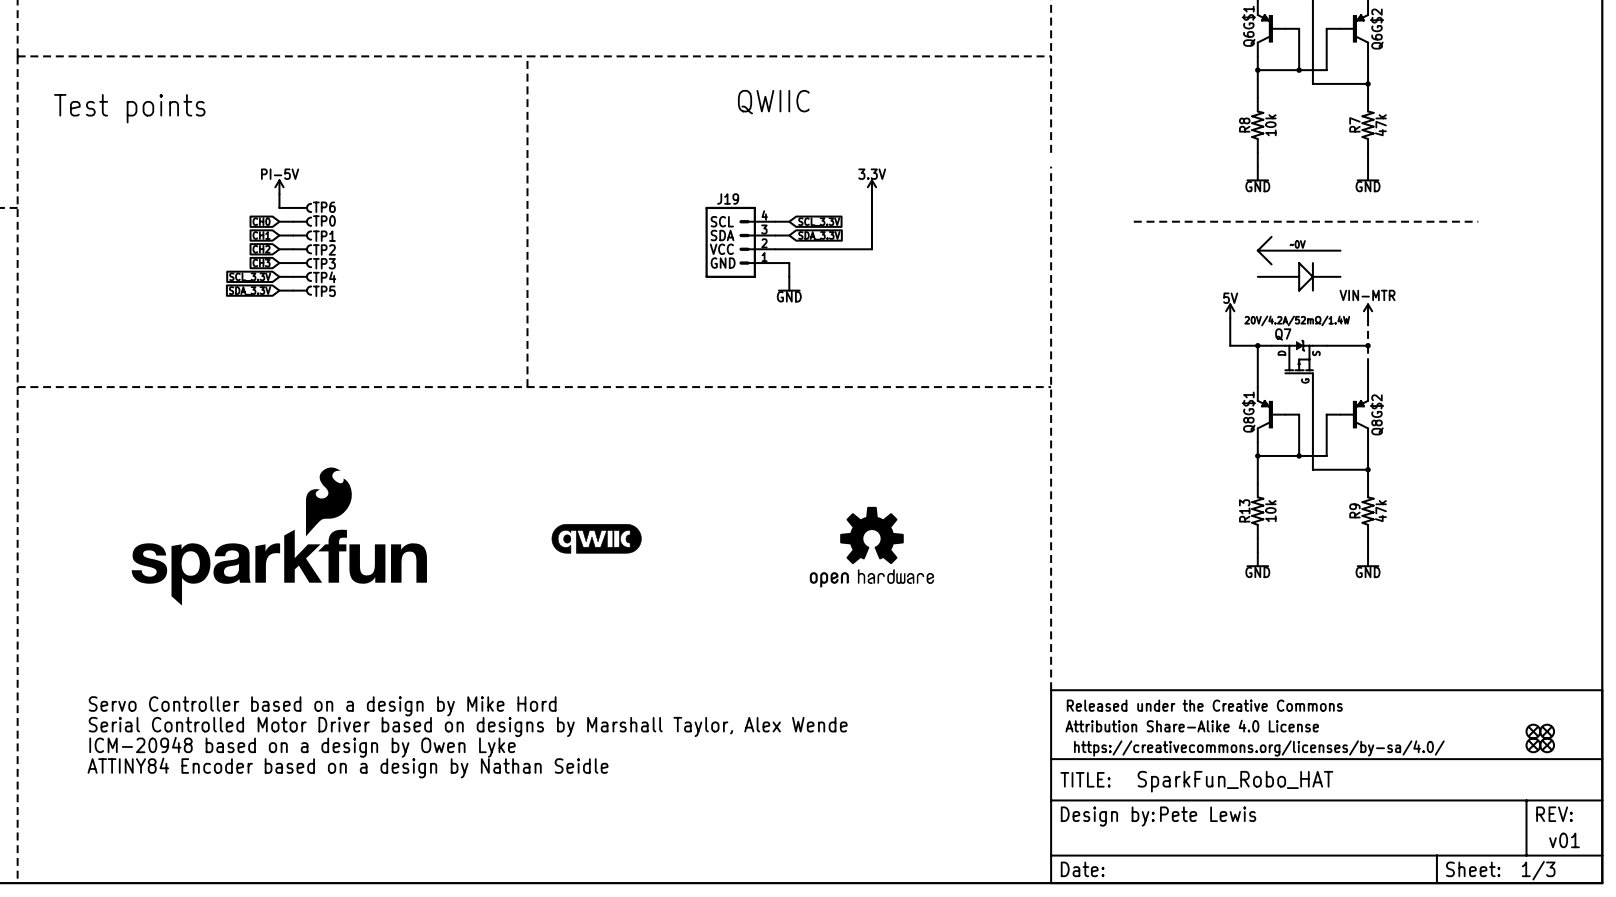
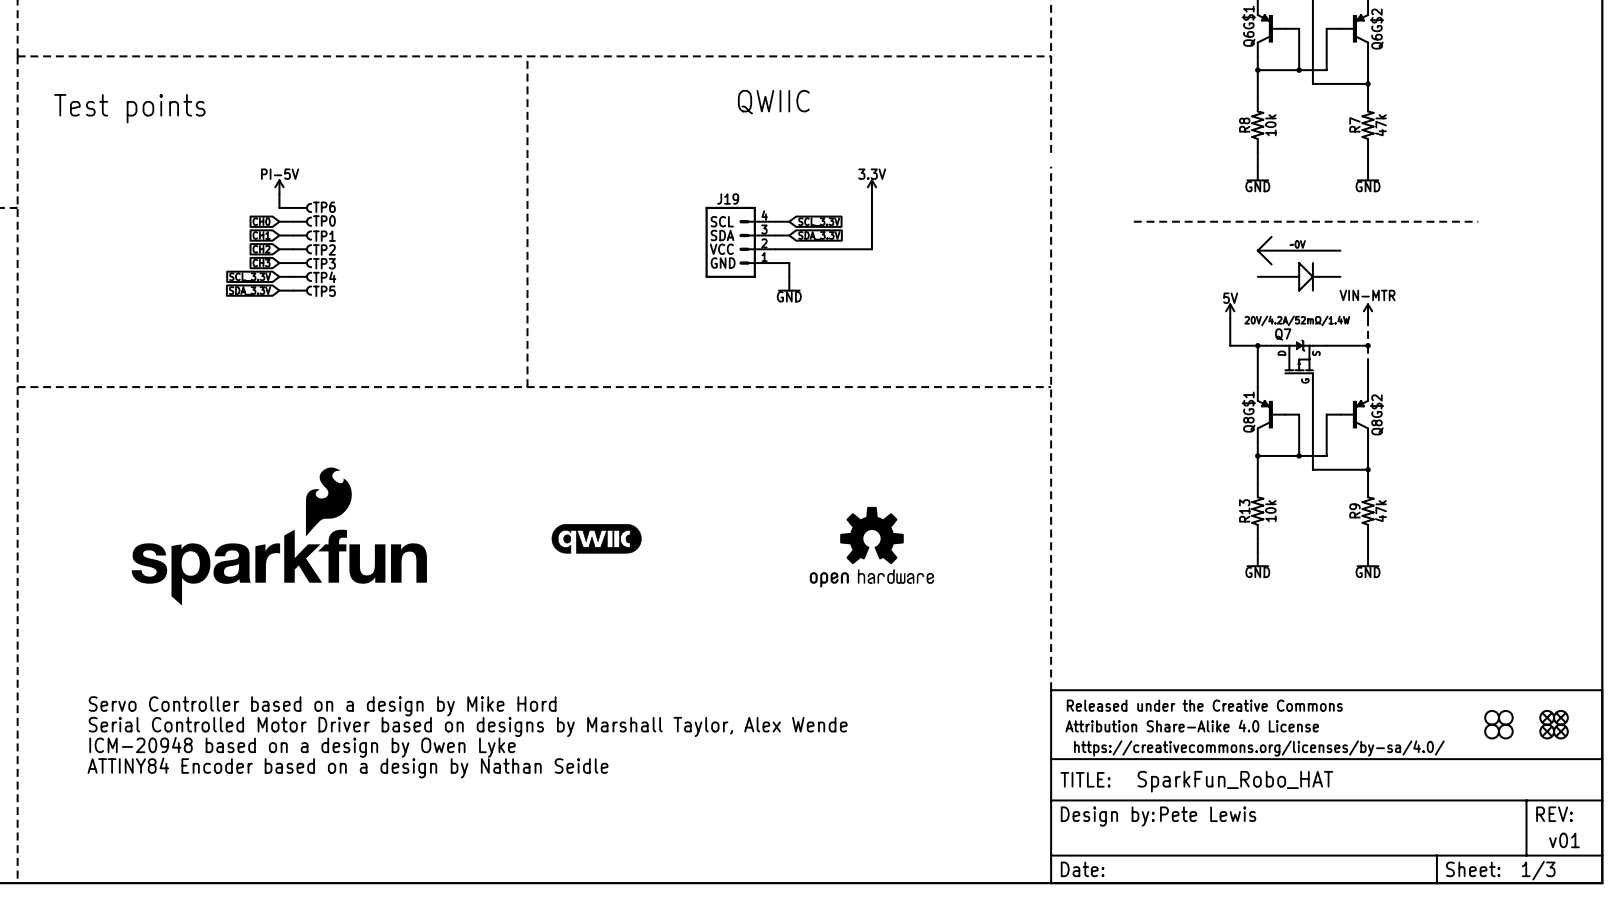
part: none -> (1492, 717)
part: none -> (1505, 717)
part: none -> (1547, 717)
part: none -> (1560, 717)
part: none -> (1492, 731)
part: none -> (1505, 731)
part: (1533, 731) -> none
part: none -> (1560, 731)
part: (1533, 745) -> none
part: (1547, 745) -> none

